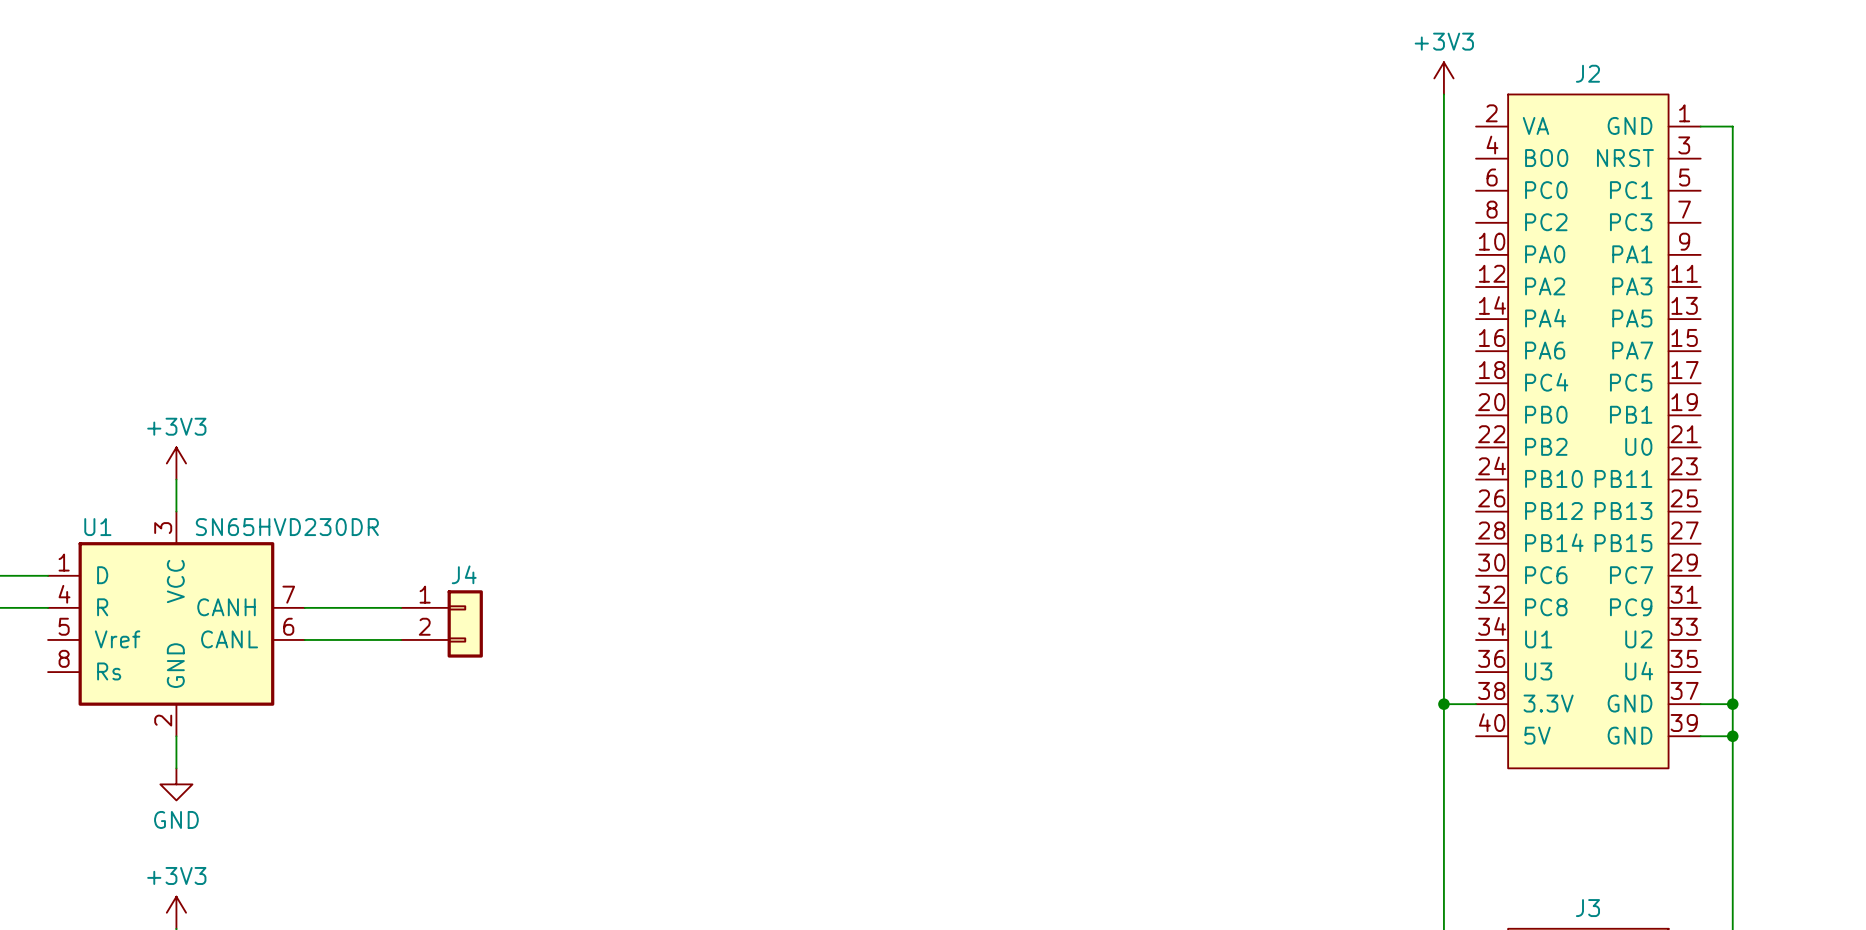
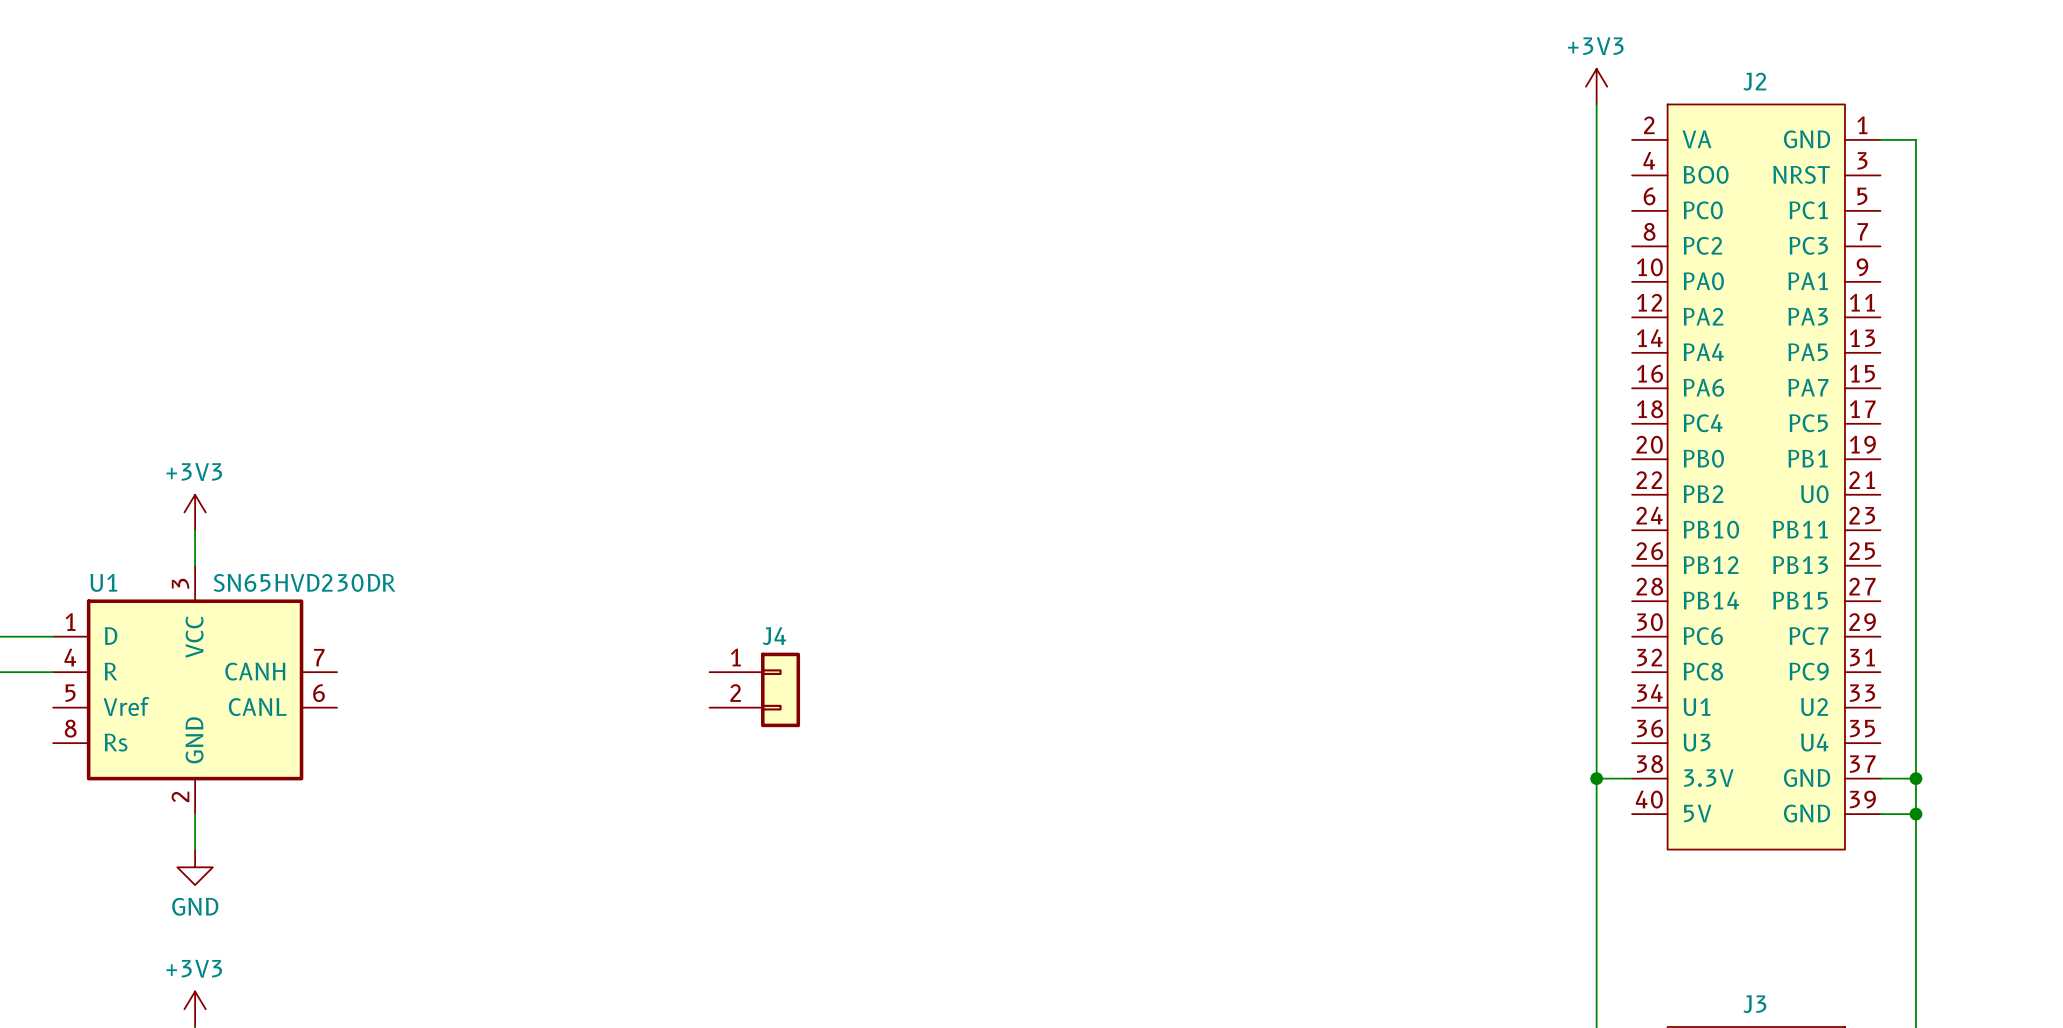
wire: (304, 607) (401, 607) -> none
J4 position: (441, 623) -> (754, 689)
wire: (304, 639) (401, 639) -> none

